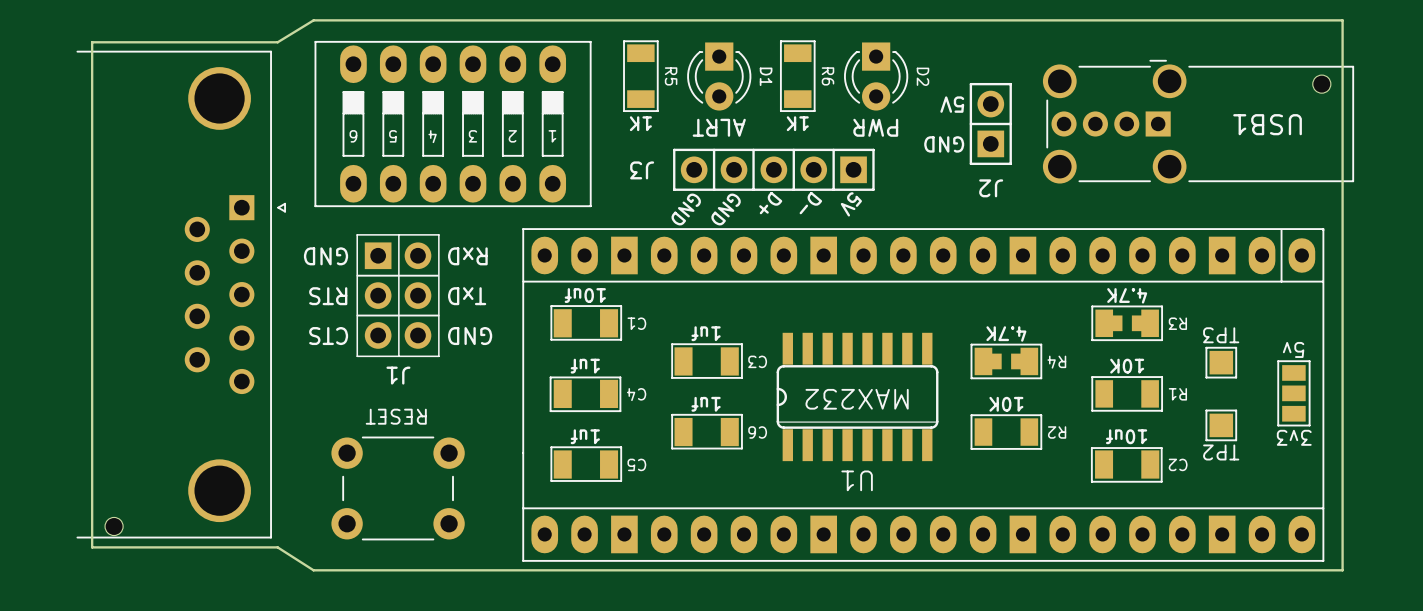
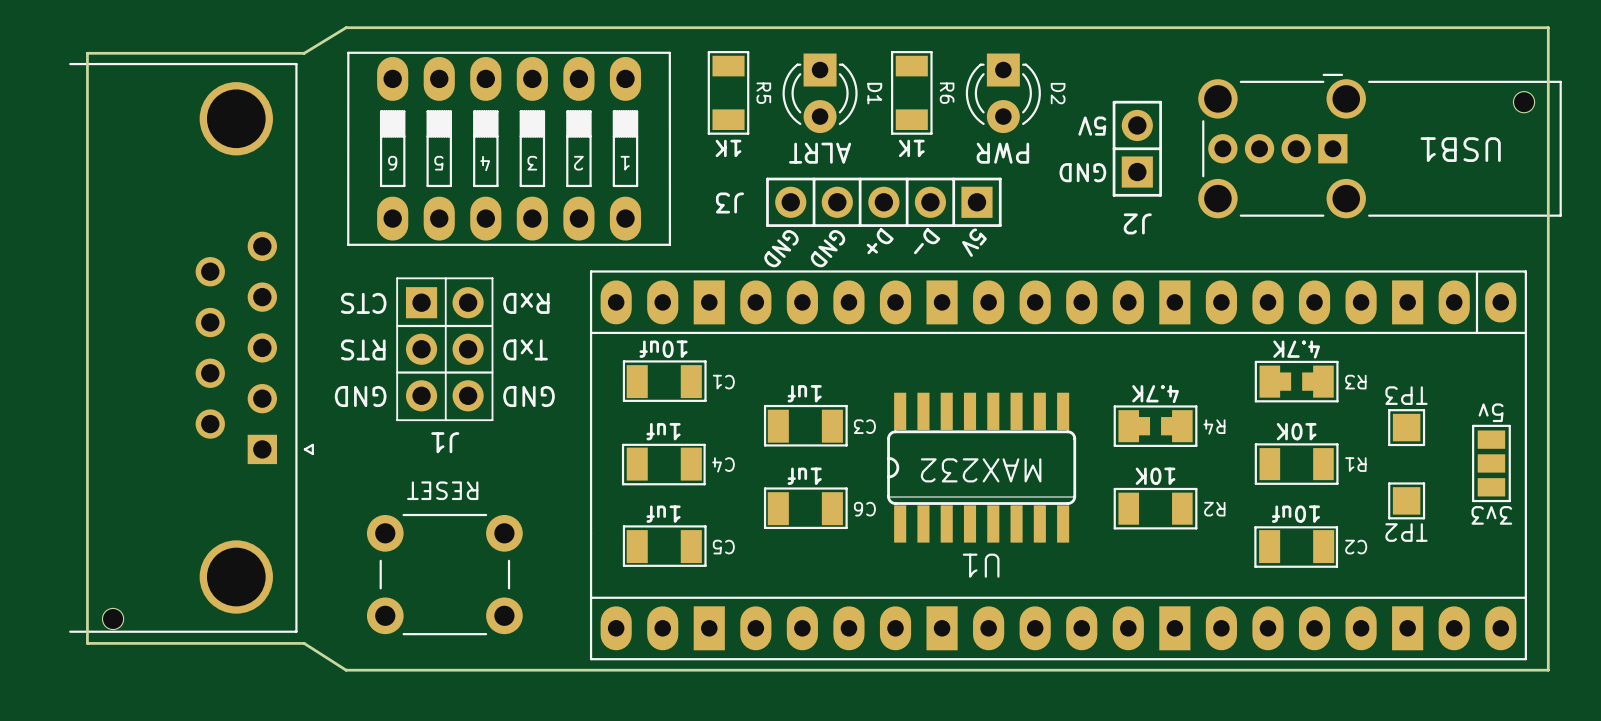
part footprint: [76, 50, 287, 539] -> [69, 62, 314, 633]
J1 text: GND (326, 256) -> CTS (363, 303)
J1 text: CTS (328, 336) -> GND (360, 396)

